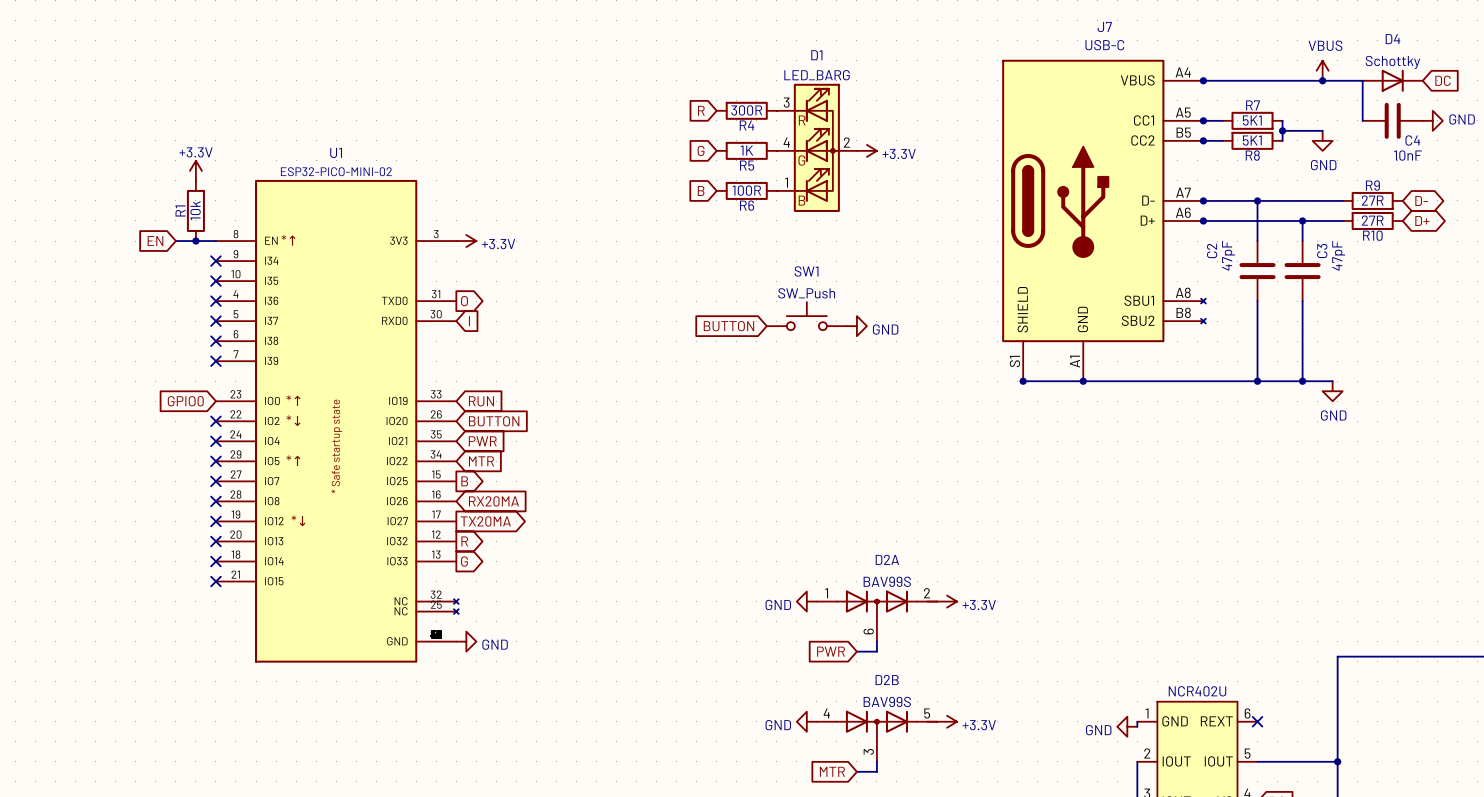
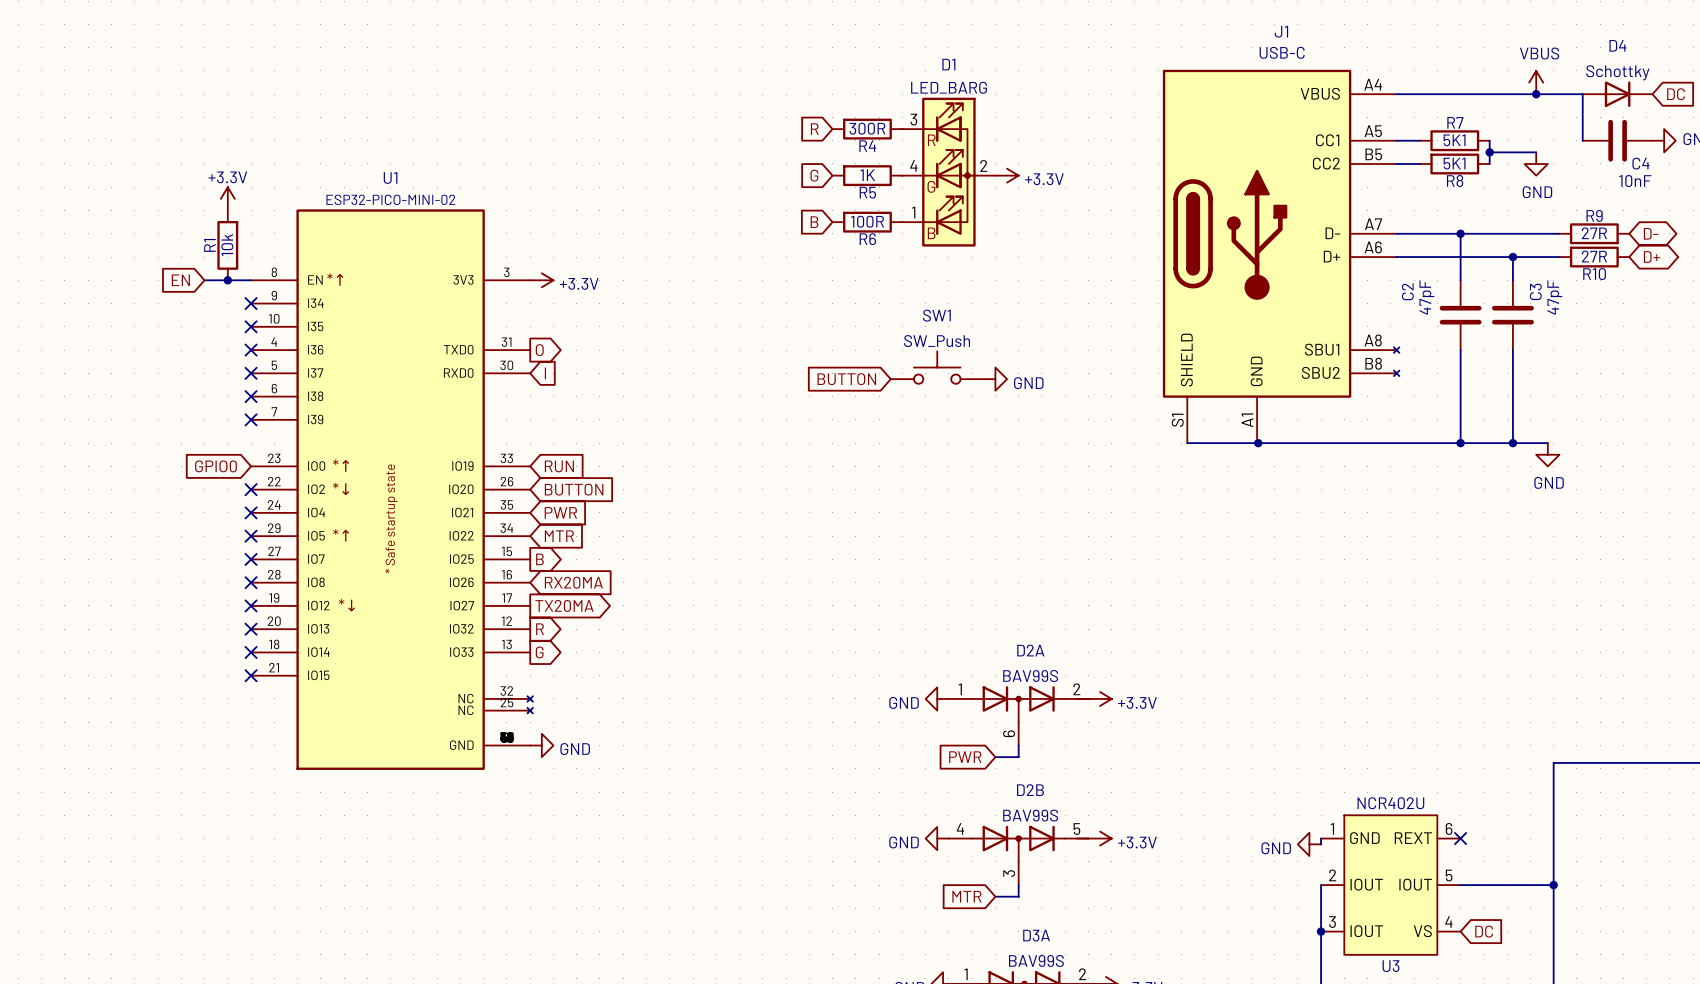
junction: (1203, 80) -> none
junction: (1203, 120) -> none
junction: (1203, 140) -> none
junction: (1203, 200) -> none
J1: none -> USB-C (1281, 256)
J7: USB-C (1103, 220) -> none
junction: (1203, 220) -> none
junction: (1023, 381) -> none

